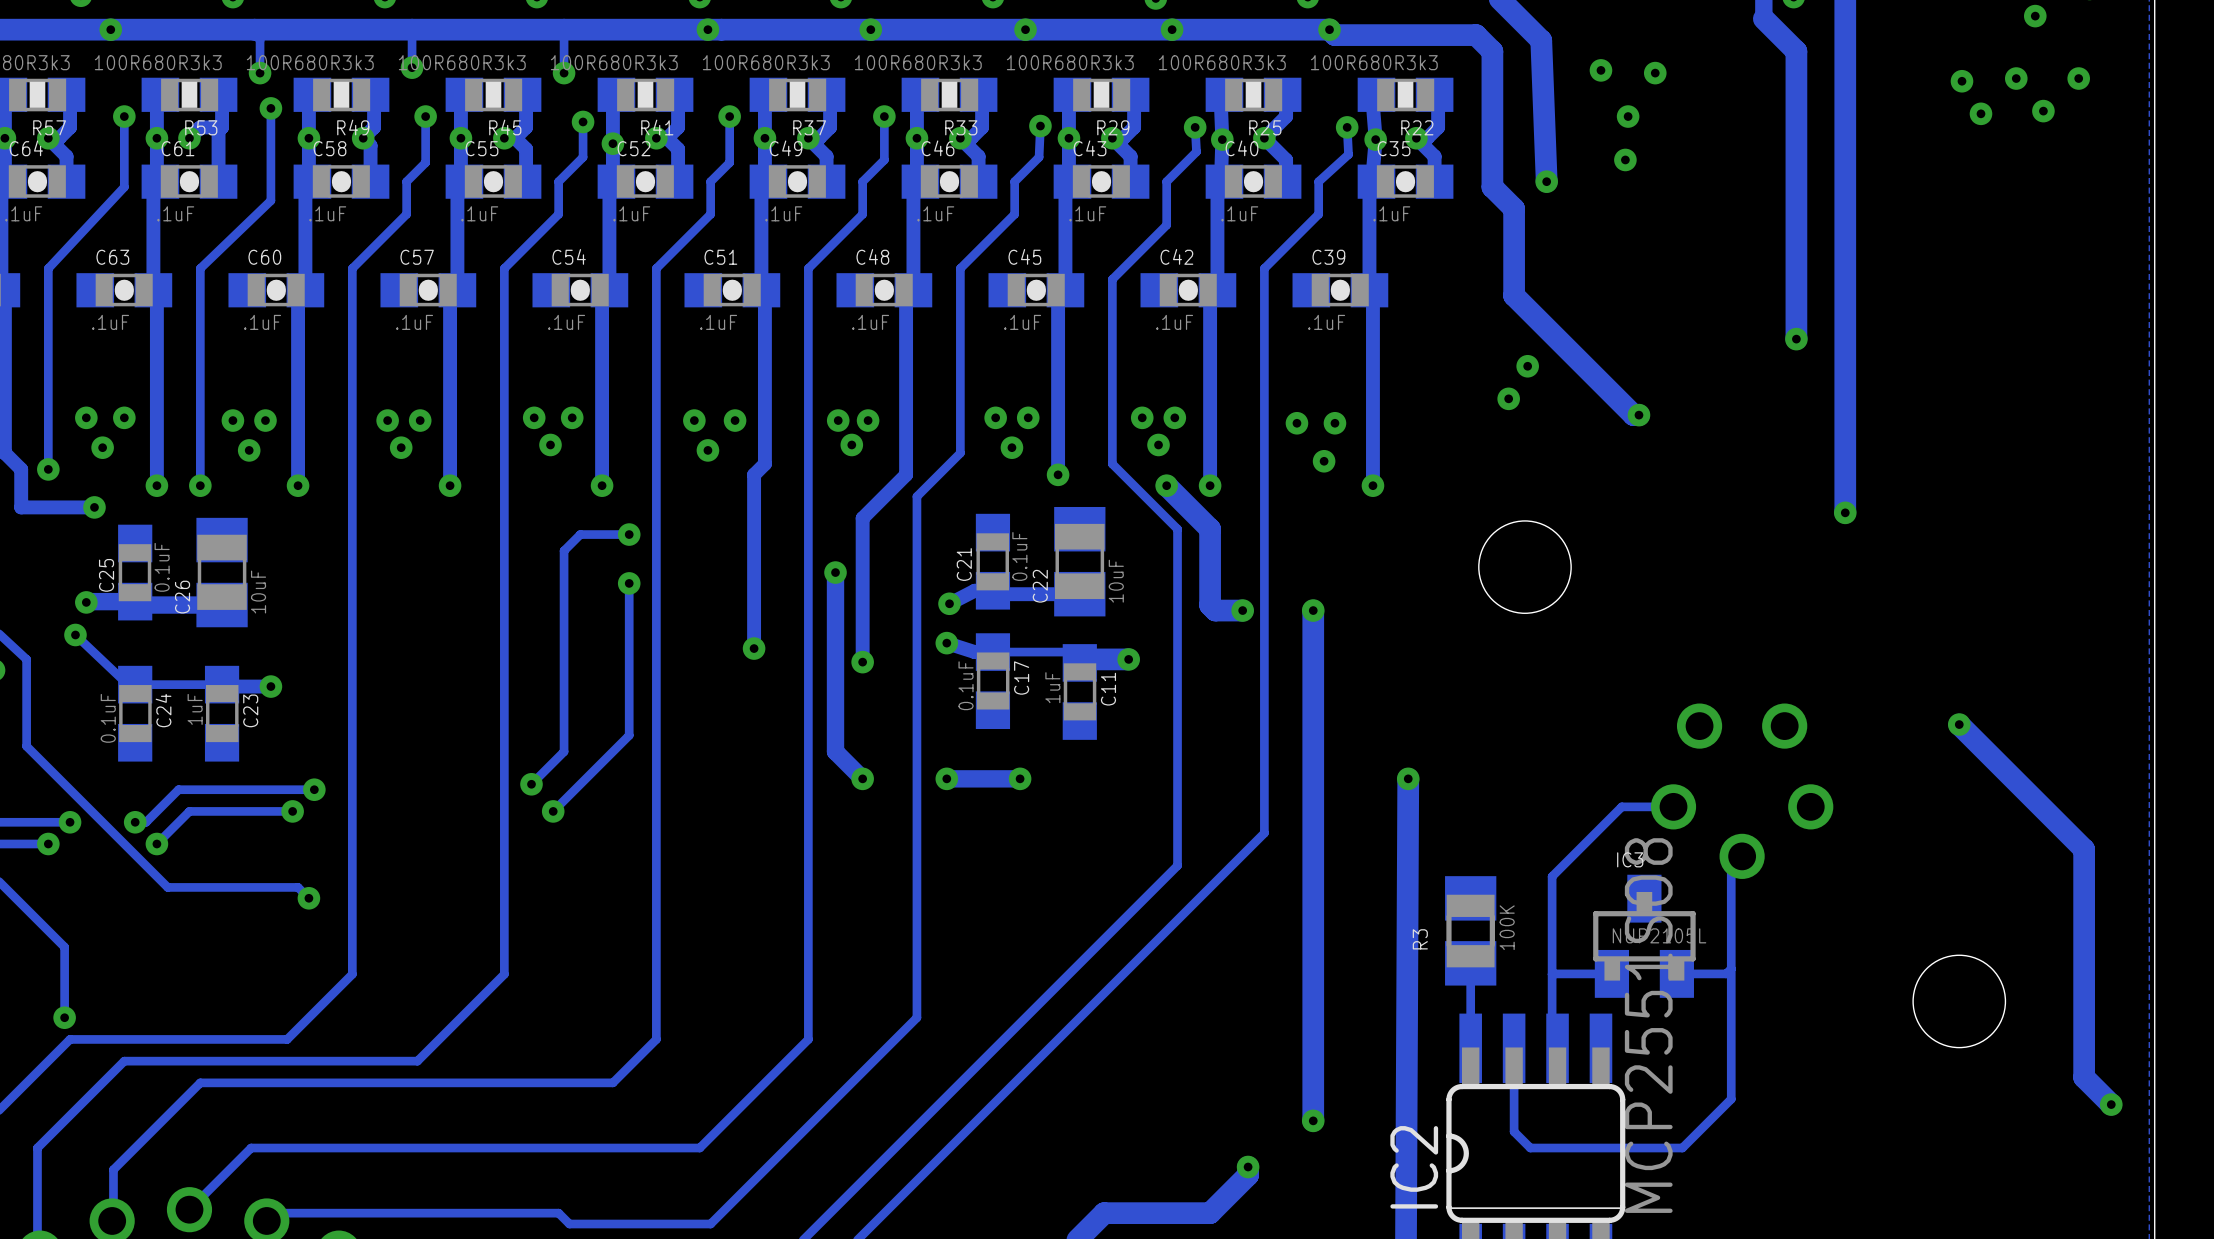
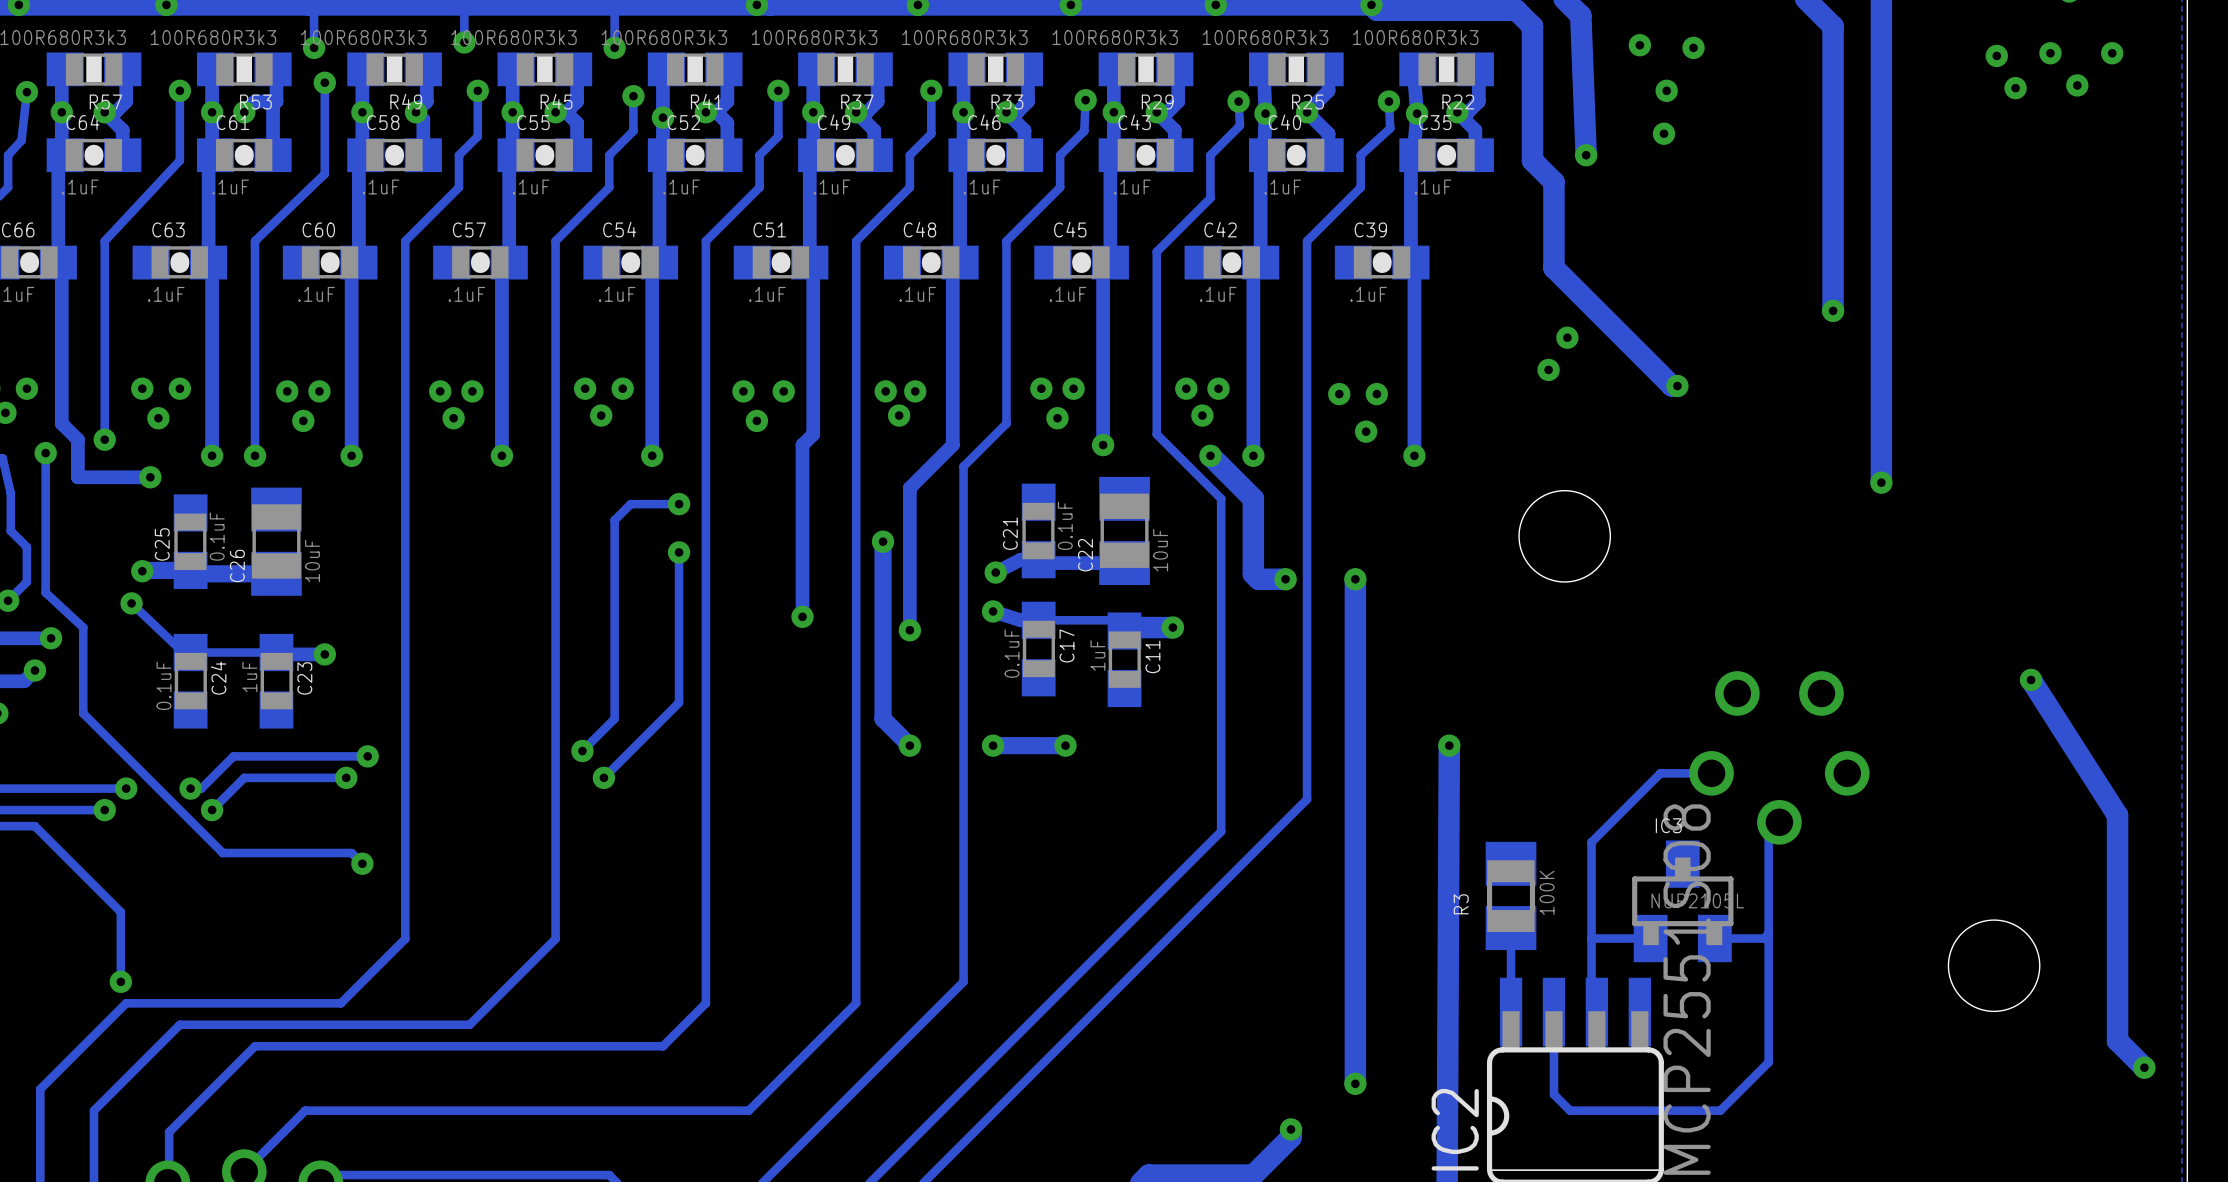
track: (1959, 724) (2084, 849) -> (2031, 679) (2117, 815)
via position: (1959, 724) -> (2031, 679)

